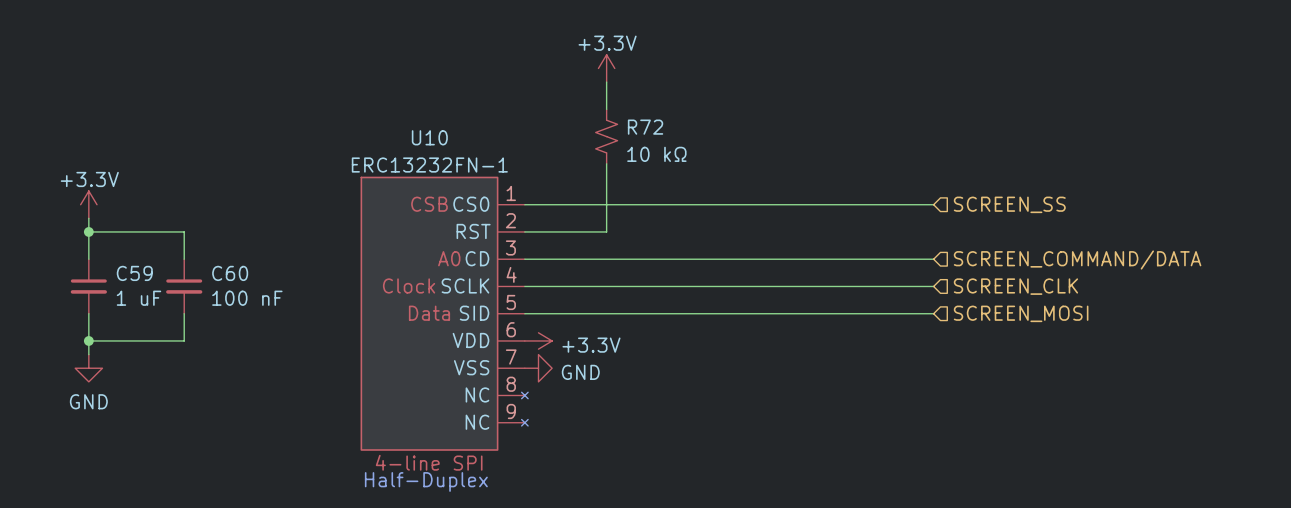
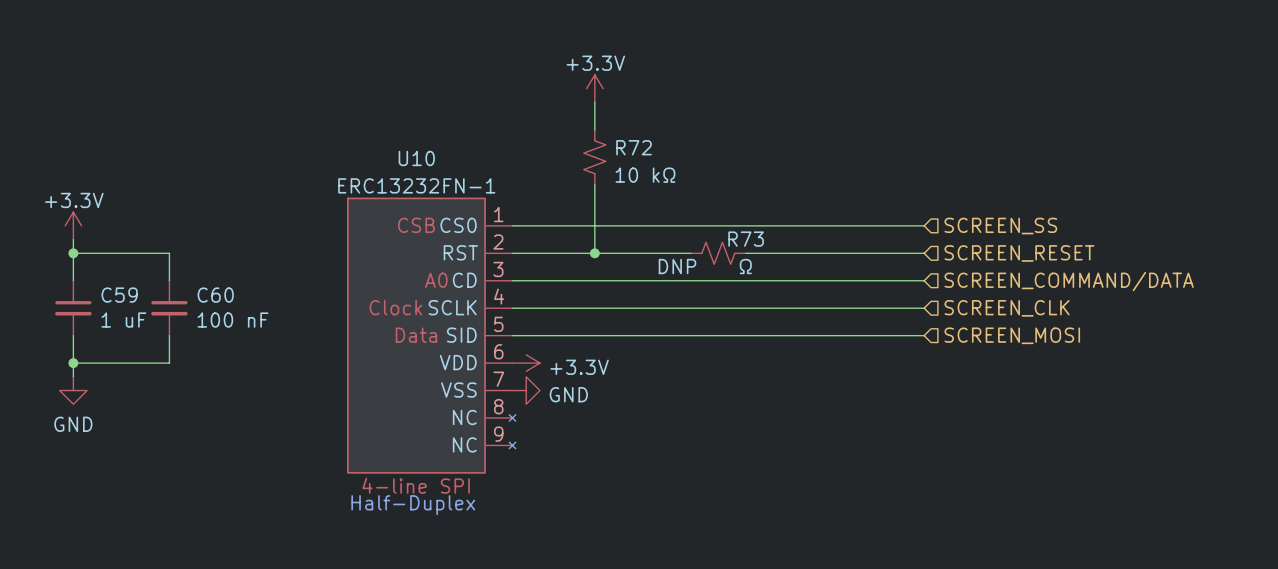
wire: none -> (594, 253) (690, 253)
junction: none -> (594, 253)
R73: none -> Ω (718, 253)
wire: none -> (745, 253) (924, 253)
hierarchical label: none -> SCREEN_RESET (1019, 253)

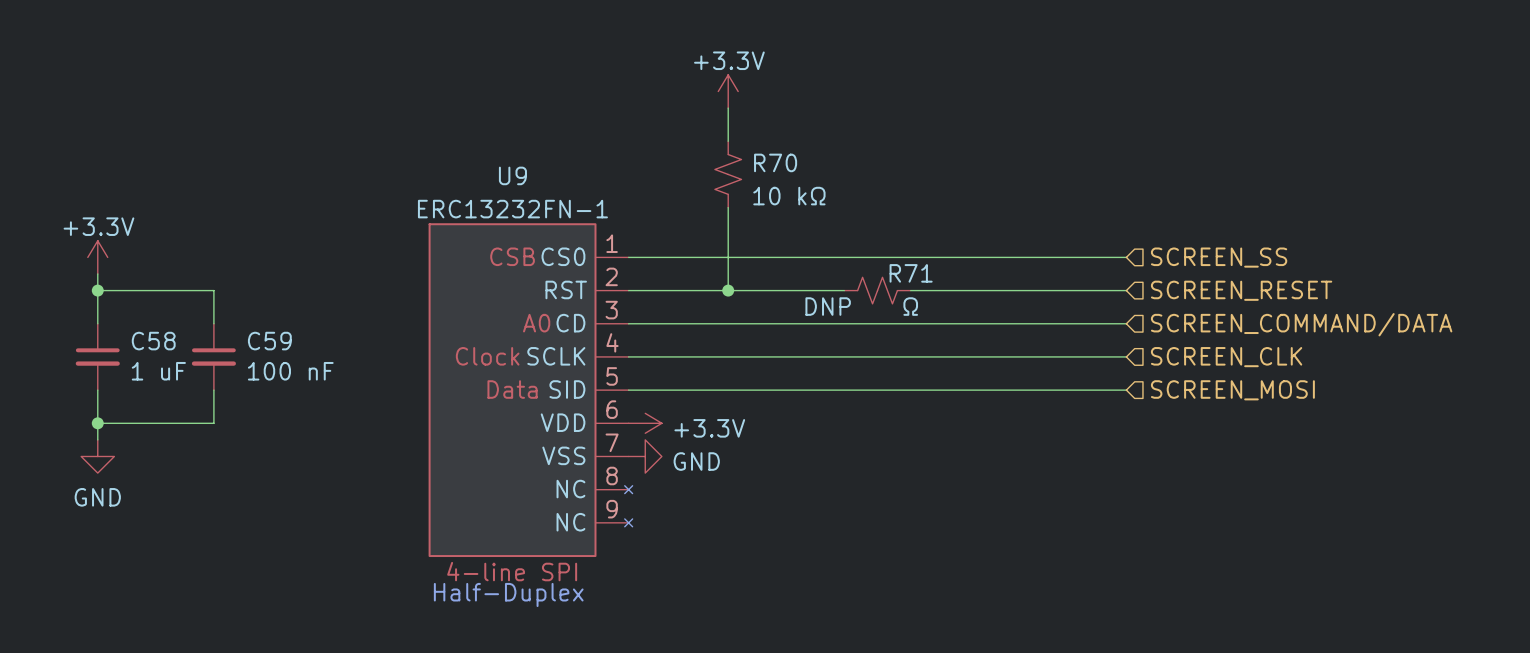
R72 name: R72 (634, 147) -> R70 (775, 162)
U10 name: U10 (416, 158) -> U9 (512, 175)
R73 name: R73 (746, 239) -> R71 (911, 273)
C59 name: C59 (119, 295) -> C58 (153, 341)
C60 name: C60 (215, 295) -> C59 (269, 341)

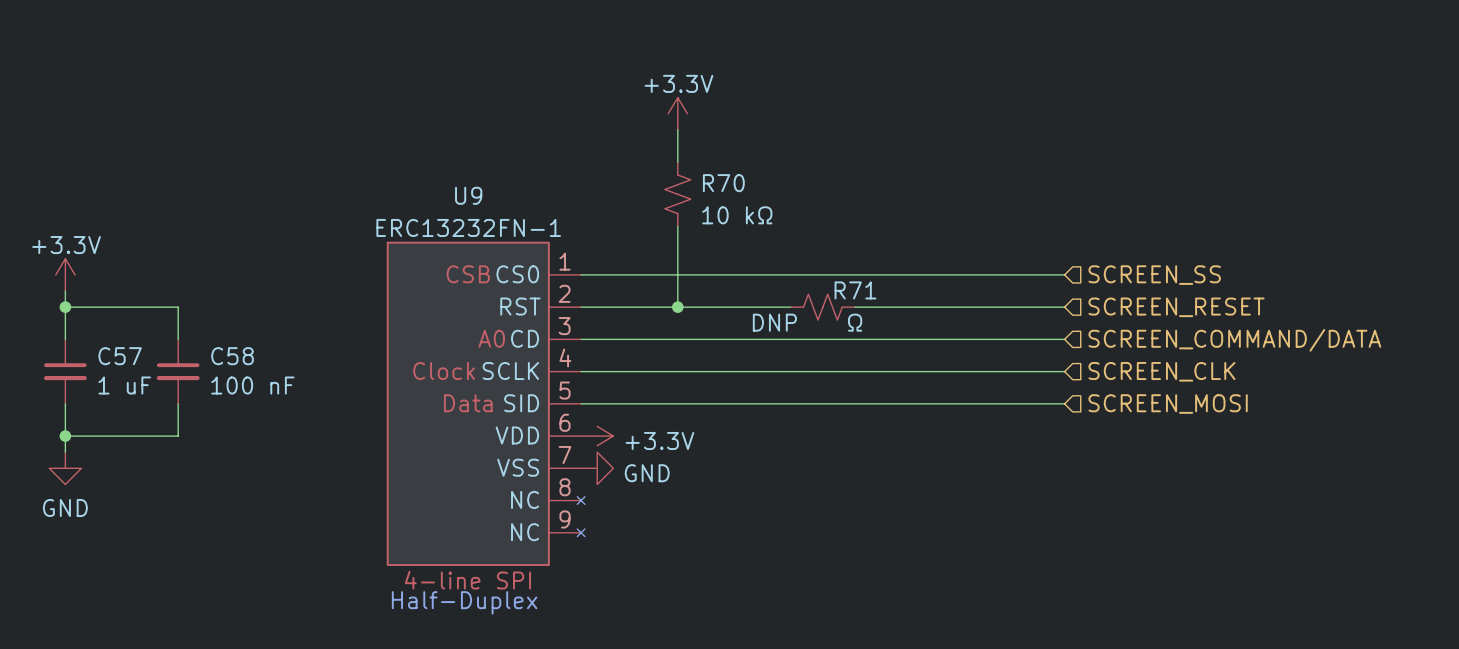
C58 name: C58 (153, 341) -> C57 (120, 356)
C59 name: C59 (269, 341) -> C58 (232, 356)

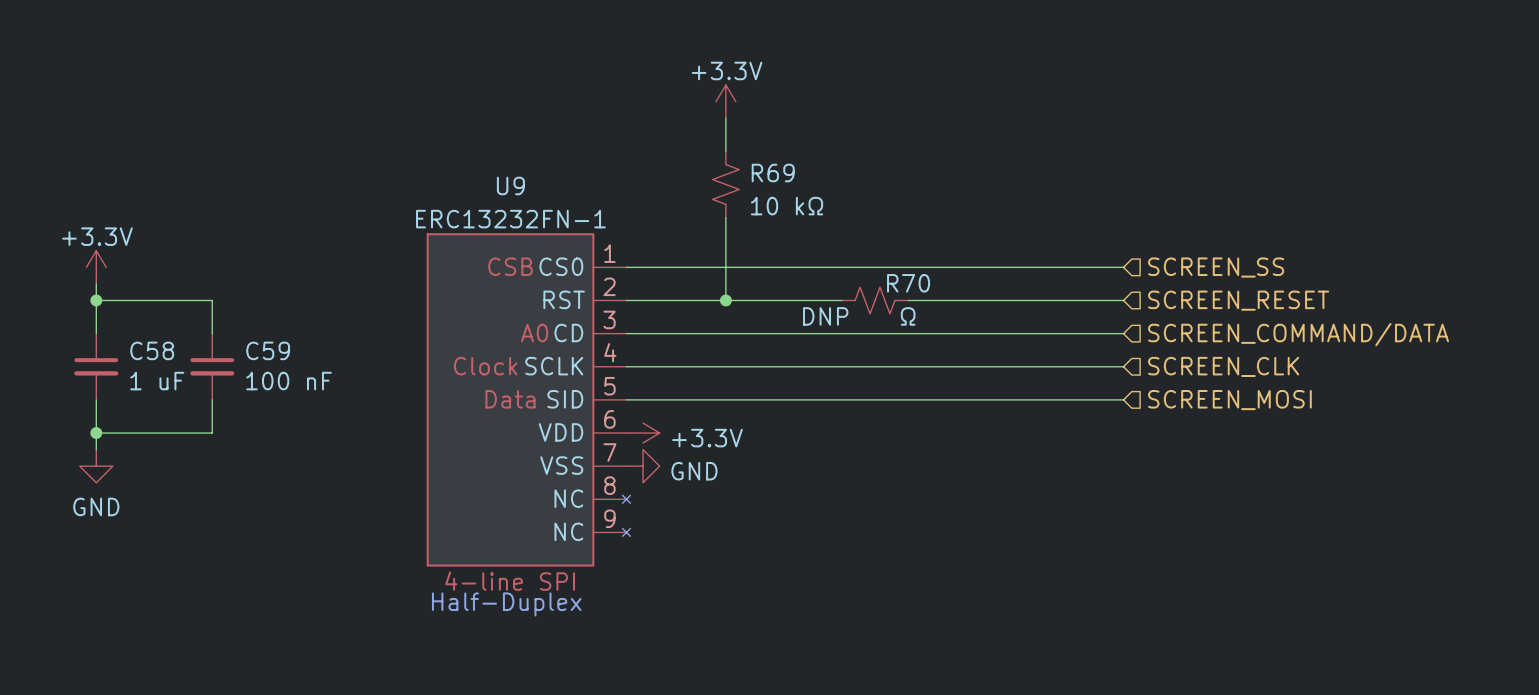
R70 name: R70 (723, 183) -> R69 (773, 173)
R71 name: R71 (855, 290) -> R70 (908, 283)
C57 name: C57 (120, 356) -> C58 (152, 350)
C58 name: C58 (232, 356) -> C59 (268, 350)

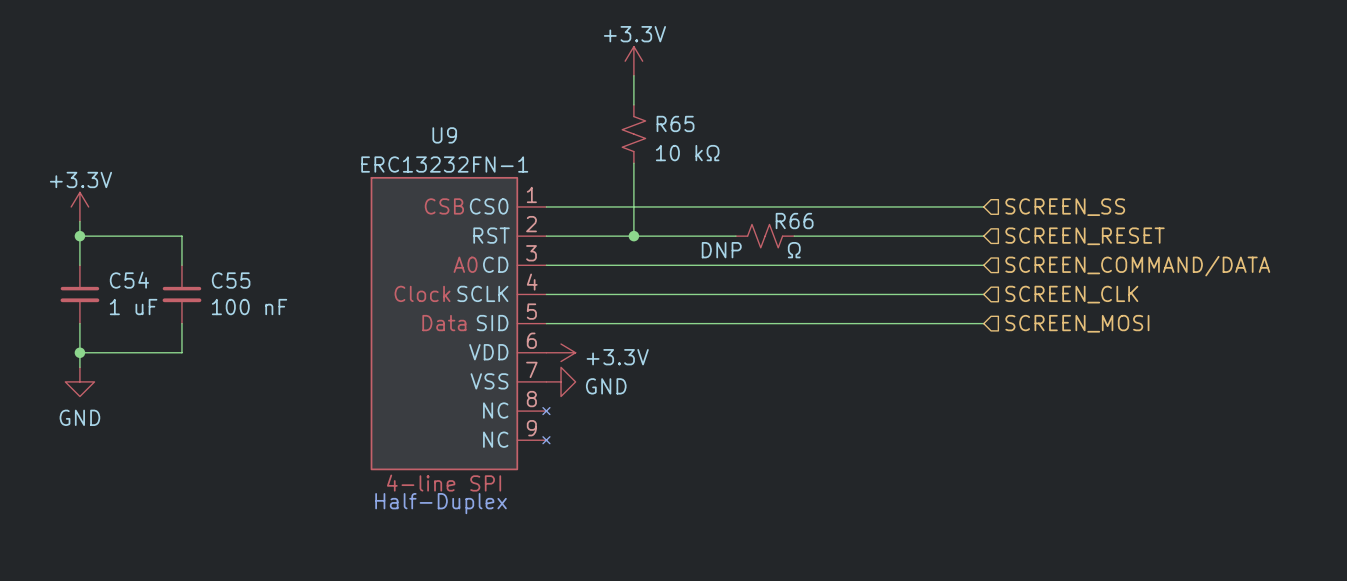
R69 name: R69 (773, 173) -> R65 (675, 123)
R70 name: R70 (908, 283) -> R66 (794, 221)
C58 name: C58 (152, 350) -> C54 (129, 280)
C59 name: C59 (268, 350) -> C55 (231, 280)

